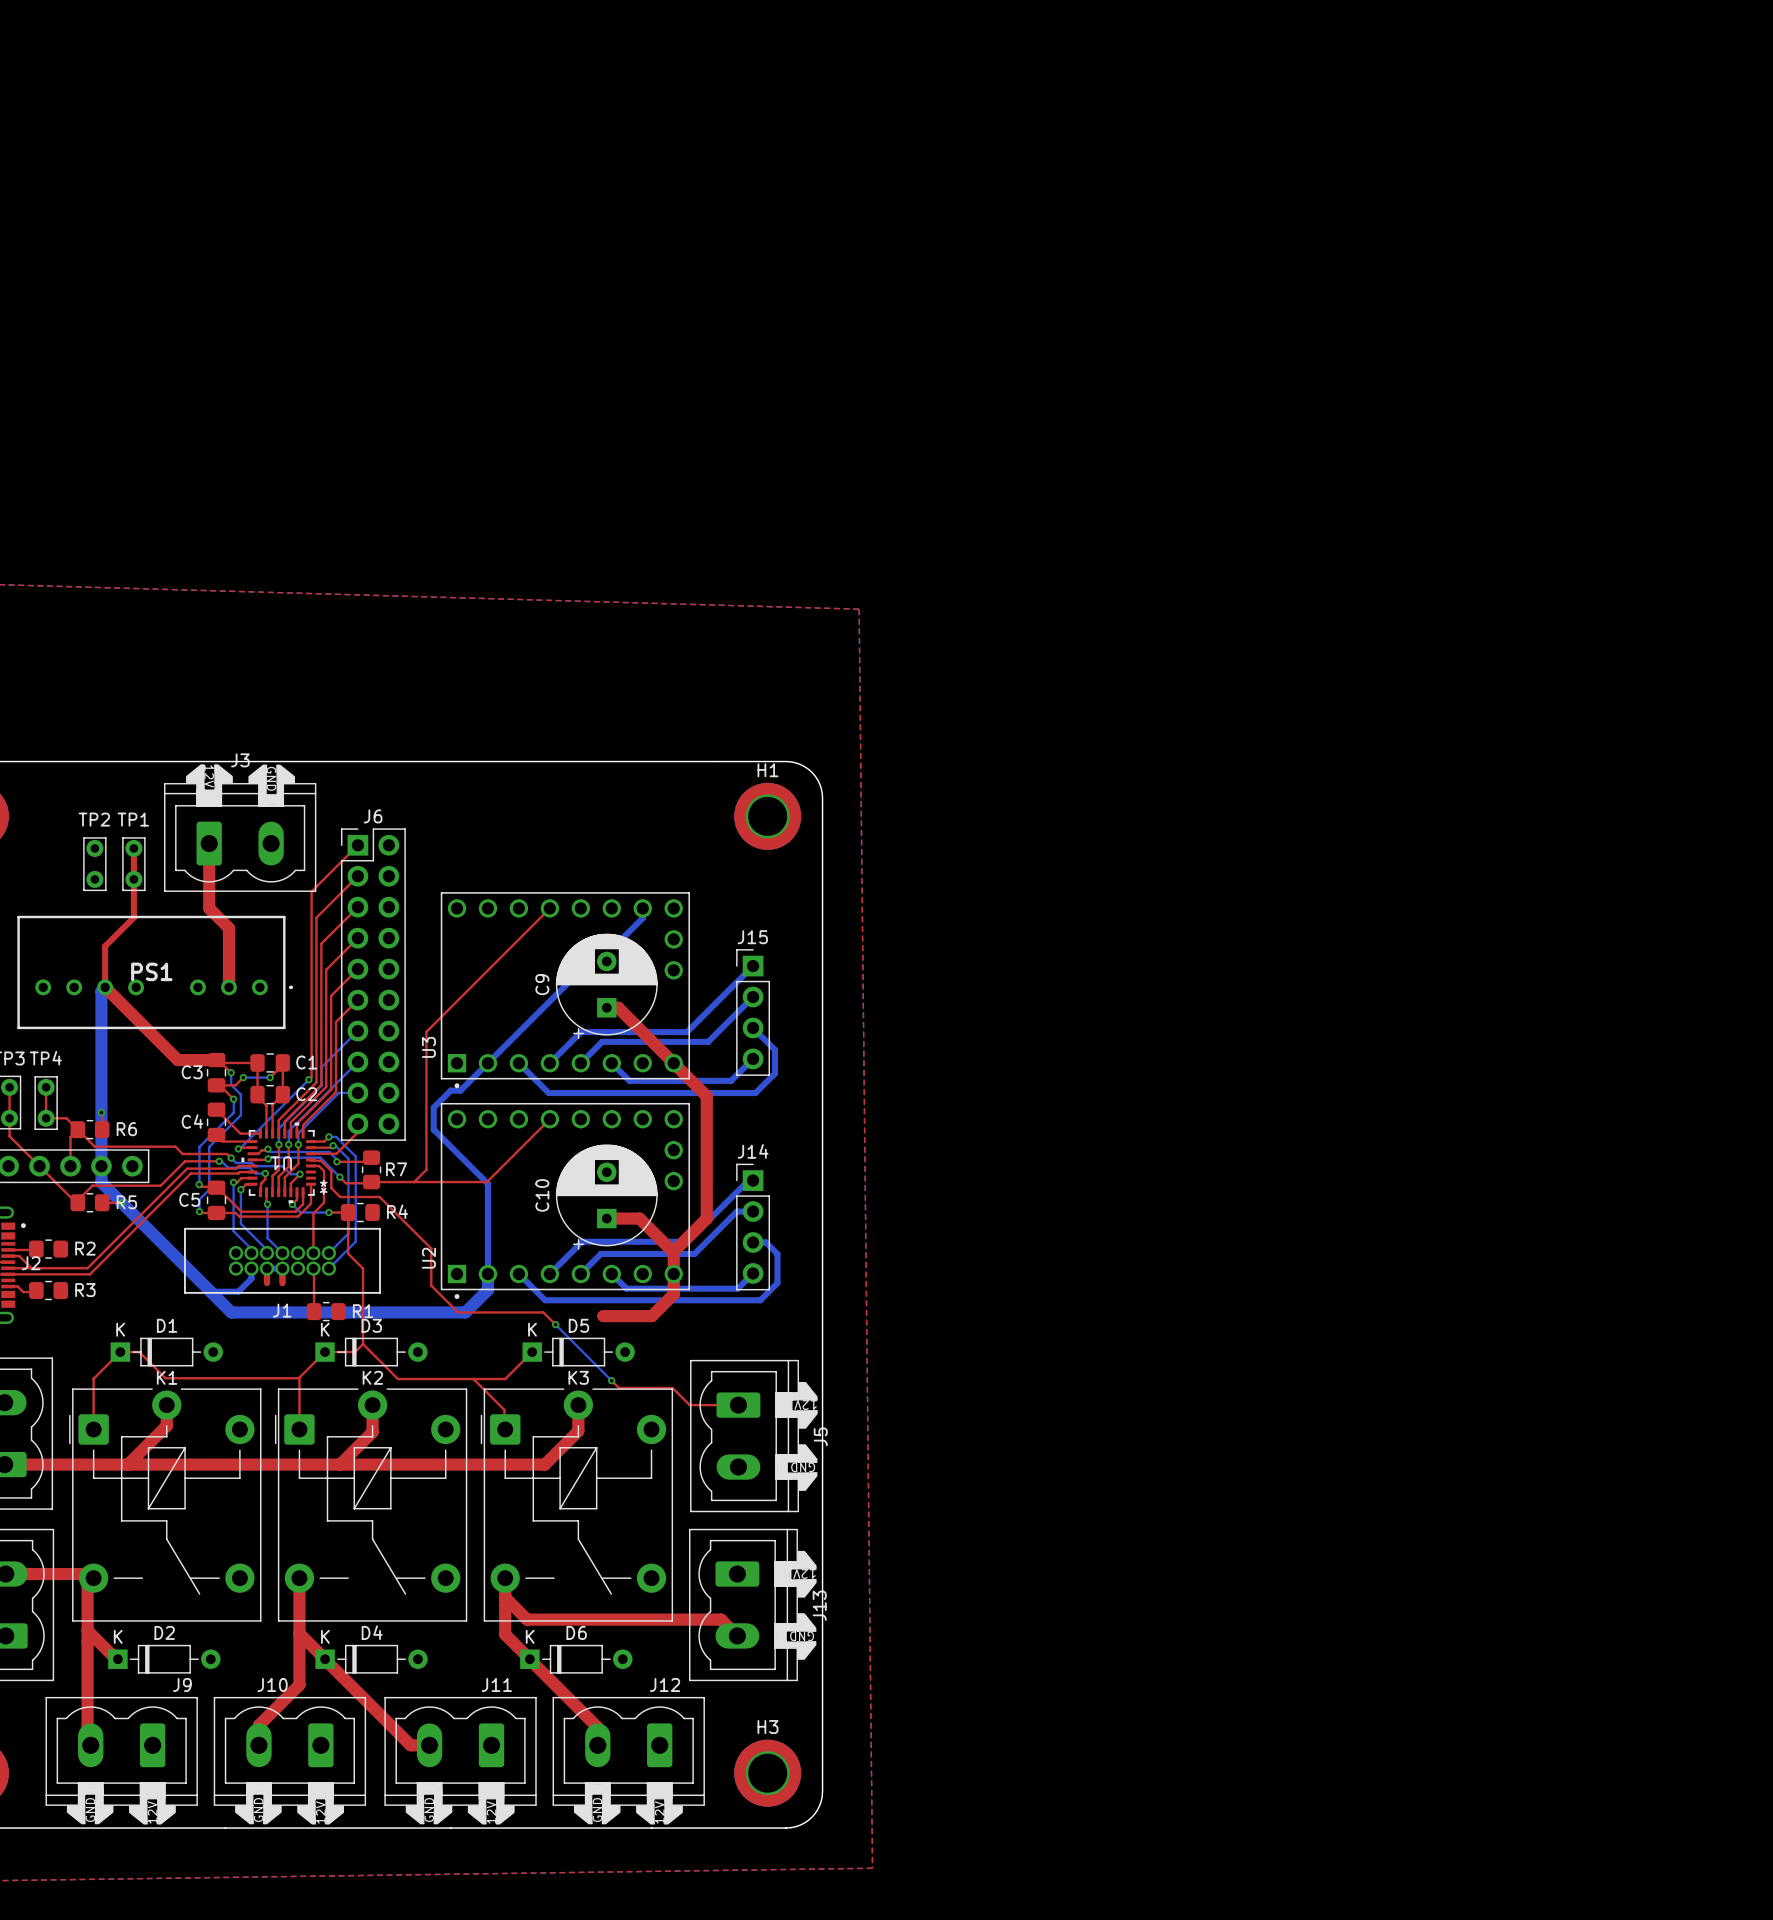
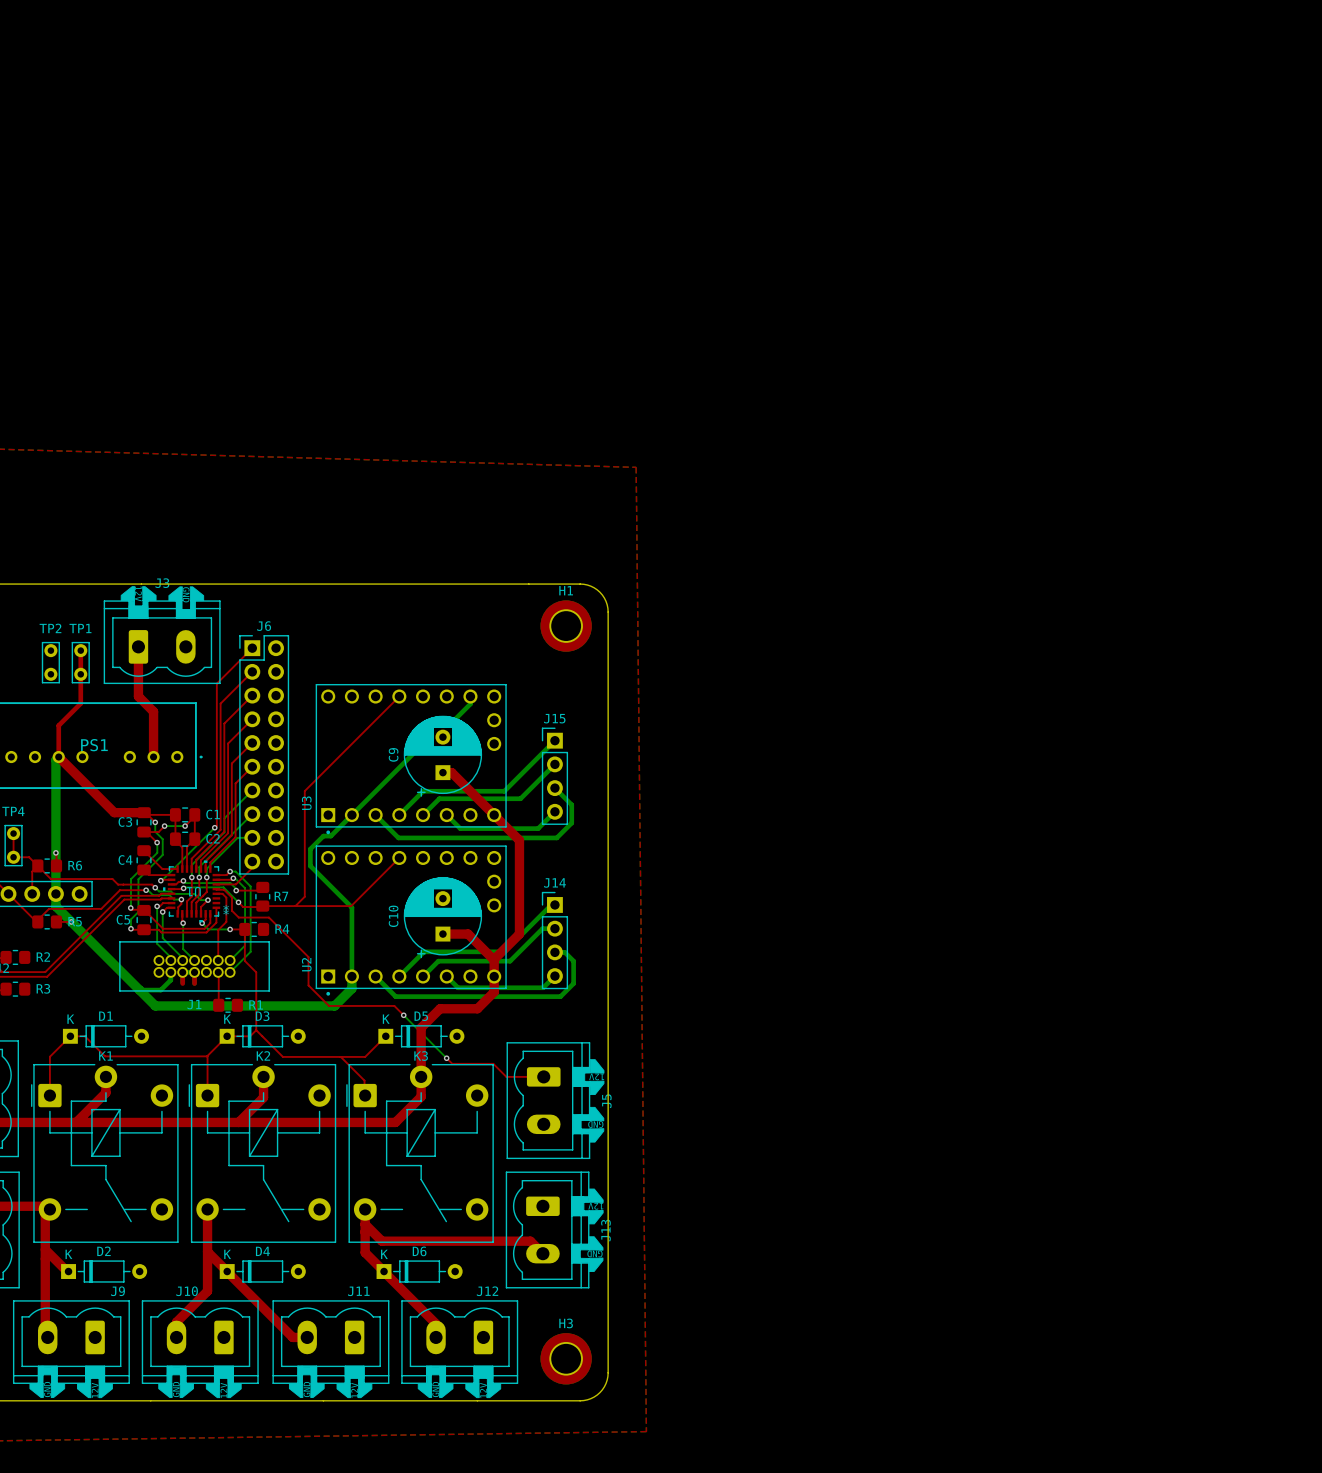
top track: none -> (440, 1008) (421, 1027) (421, 1076)

